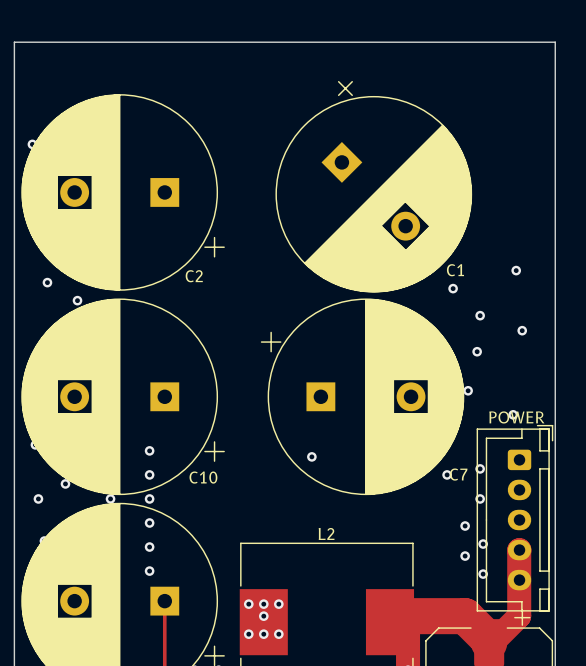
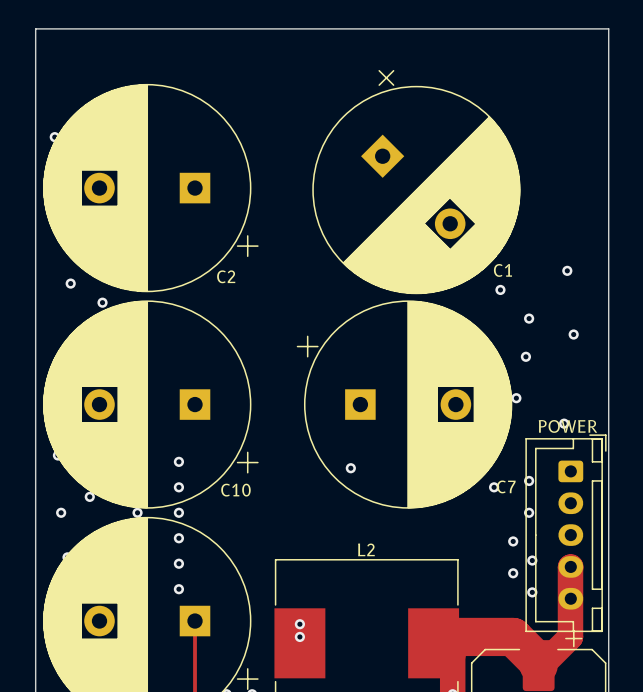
via: (248, 604) -> none
via: (278, 604) -> none
via: (248, 634) -> none
via: (263, 634) -> none
via: (278, 634) -> none

